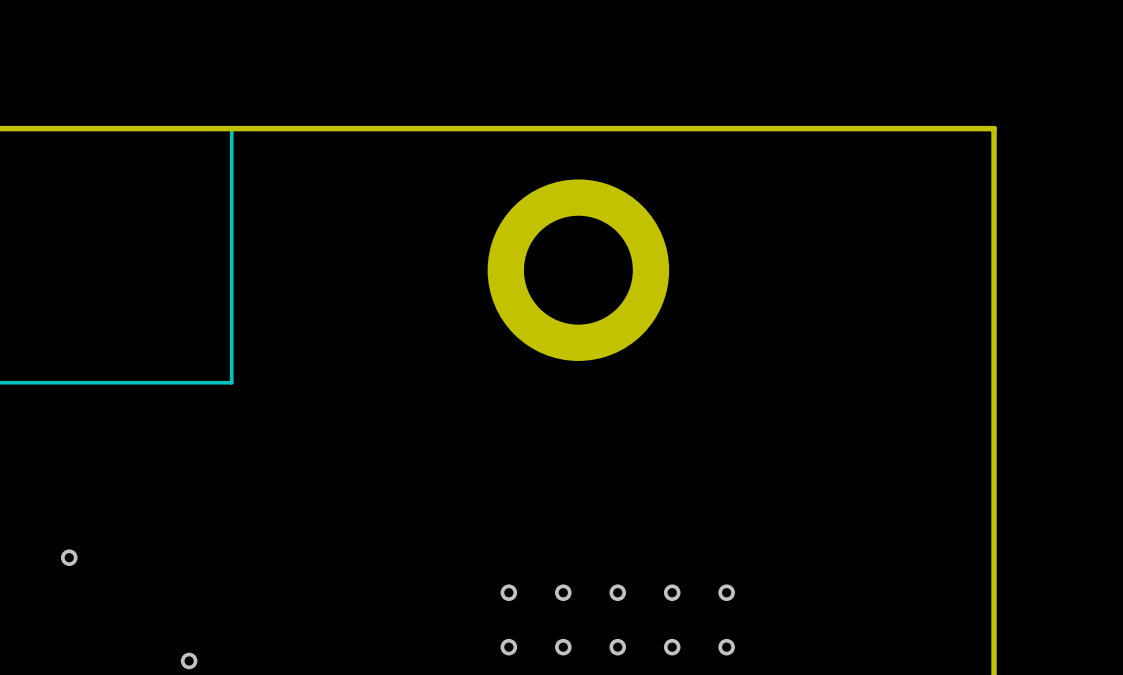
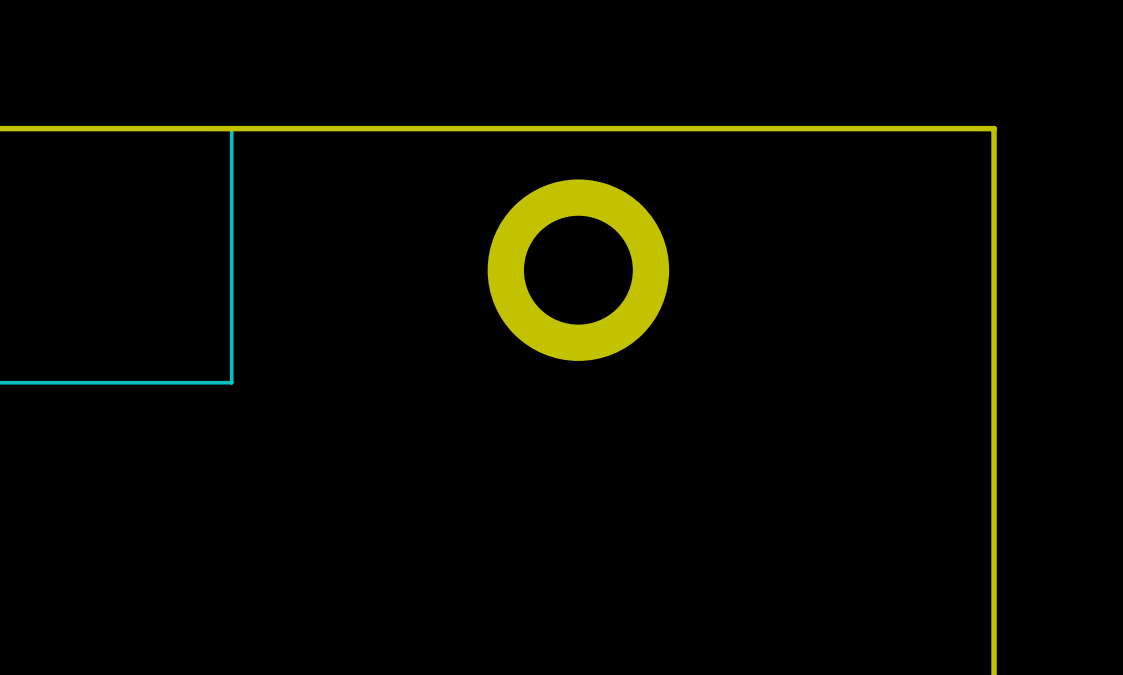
via: (69, 557) -> none
via: (508, 592) -> none
via: (563, 592) -> none
via: (617, 592) -> none
via: (672, 592) -> none
via: (726, 592) -> none
via: (508, 647) -> none
via: (563, 647) -> none
via: (617, 647) -> none
via: (672, 647) -> none
via: (726, 647) -> none
via: (189, 660) -> none

